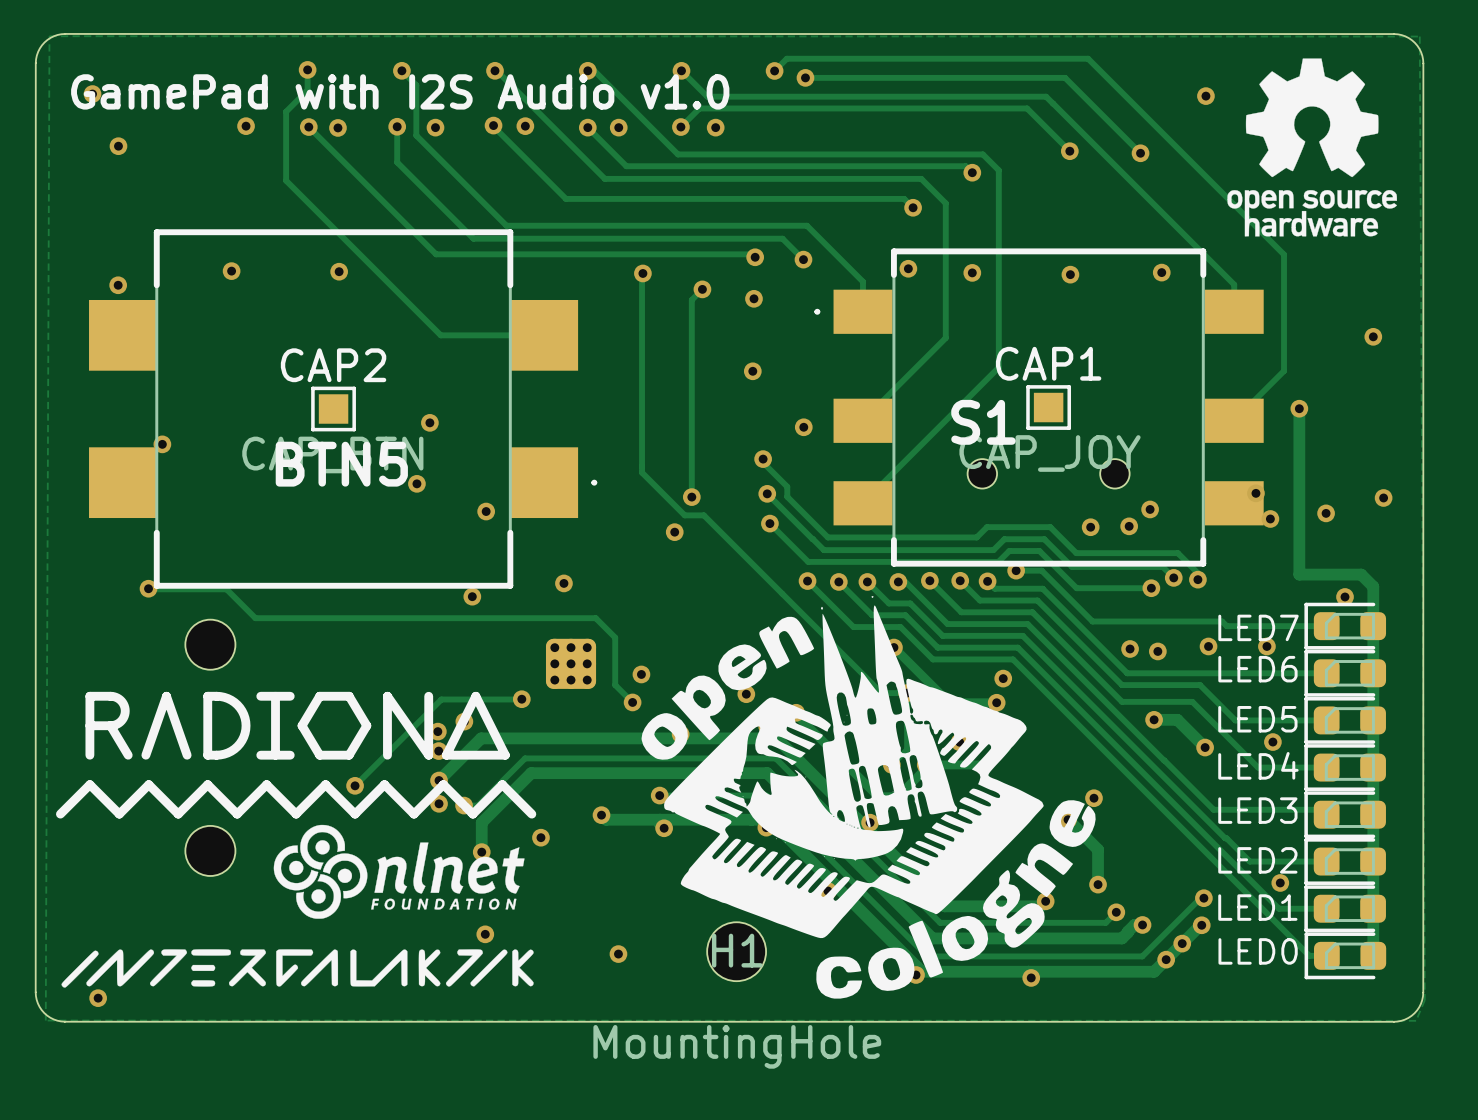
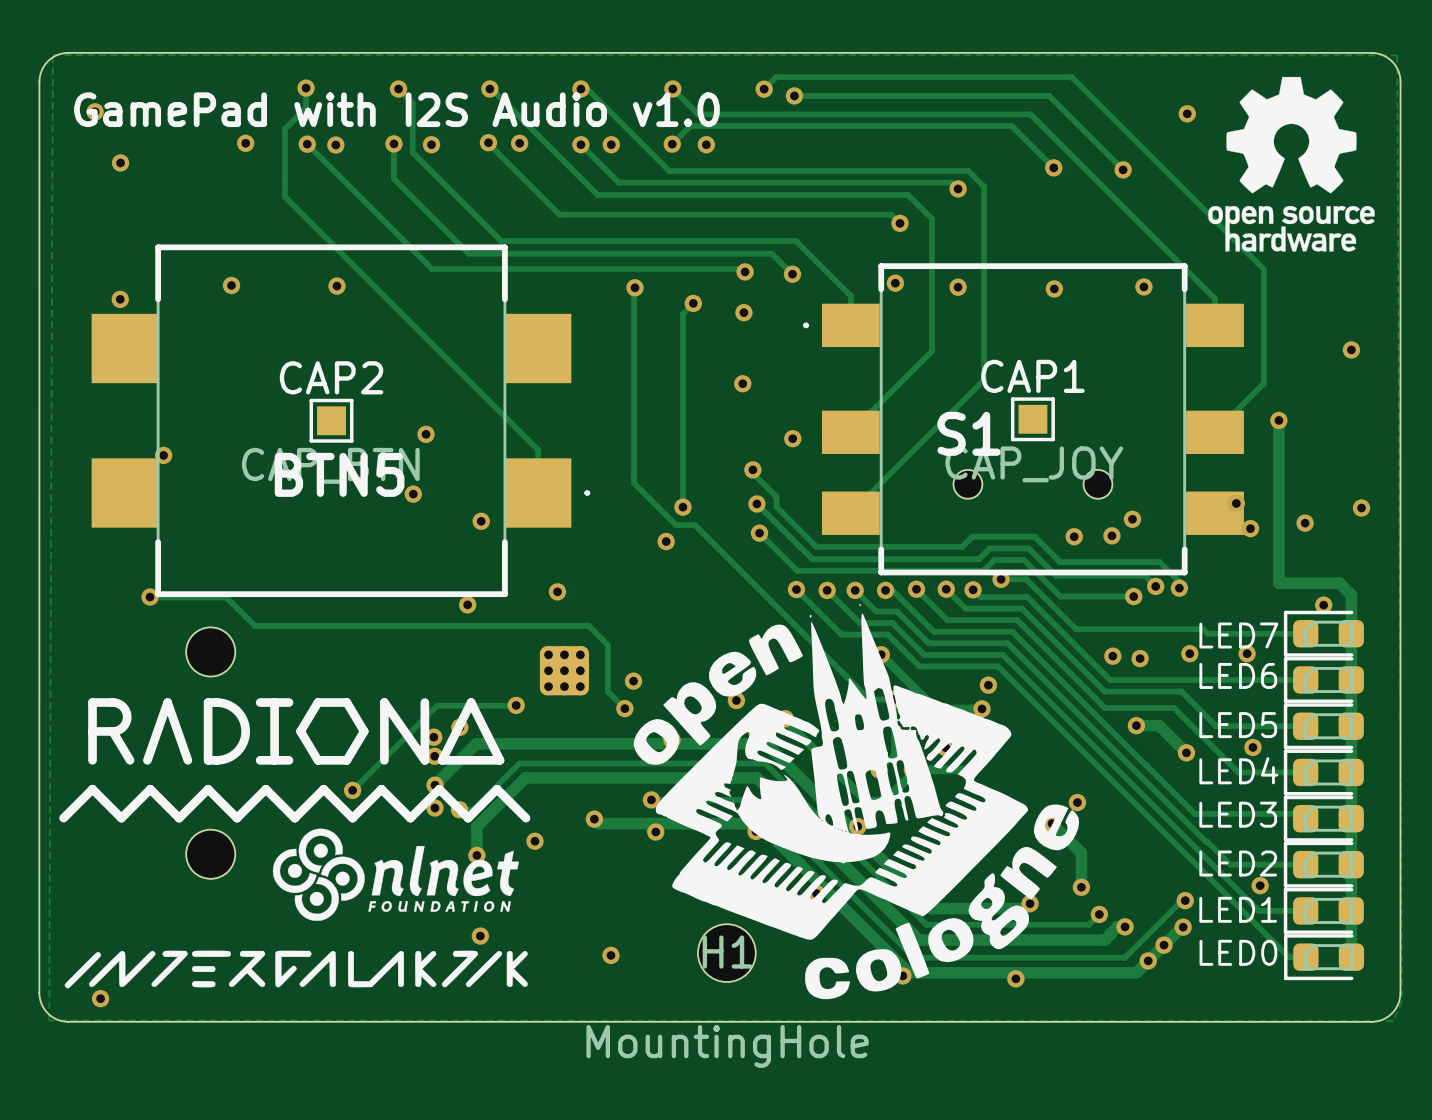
track: (440, 335) (544, 335) -> (436, 348) (538, 449) (538, 493)

